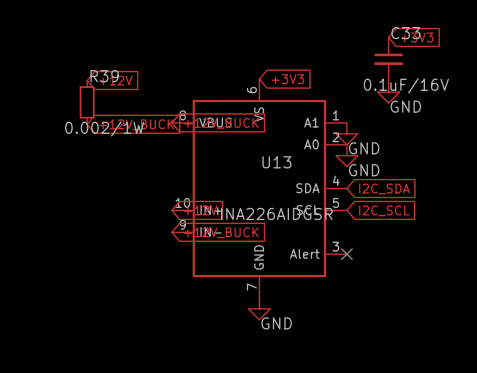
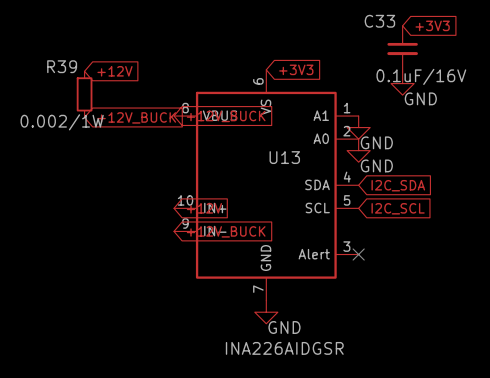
C33 name position: C33 (405, 33) -> C33 (379, 21)
R39 name position: R39 (104, 76) -> R39 (62, 66)
R39 value position: 0.002/1W (104, 128) -> 0.002/1W (62, 122)
U13 value position: INA226AIDGSR (276, 213) -> INA226AIDGSR (284, 348)

